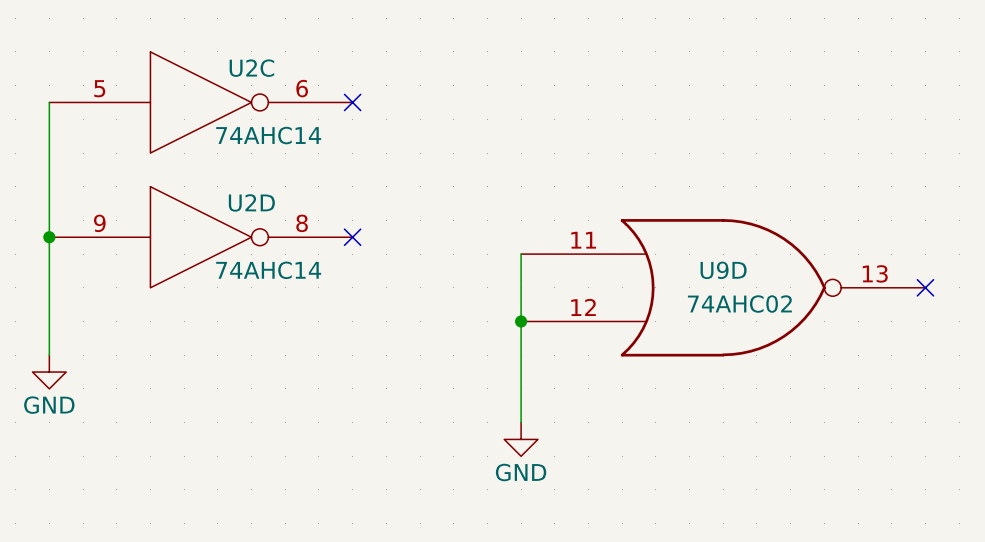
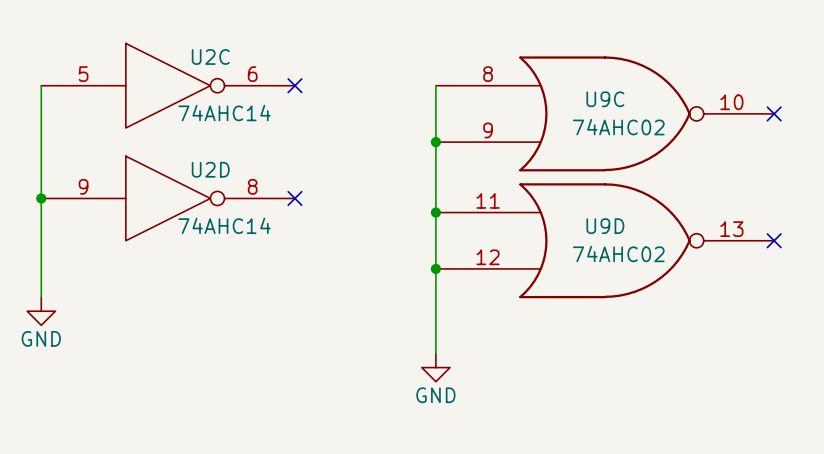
wire: none -> (435, 85) (435, 212)
U9C: none -> 74AHC02 (605, 113)
no-connect mark: none -> (774, 113)
junction: none -> (435, 142)
junction: none -> (435, 212)

